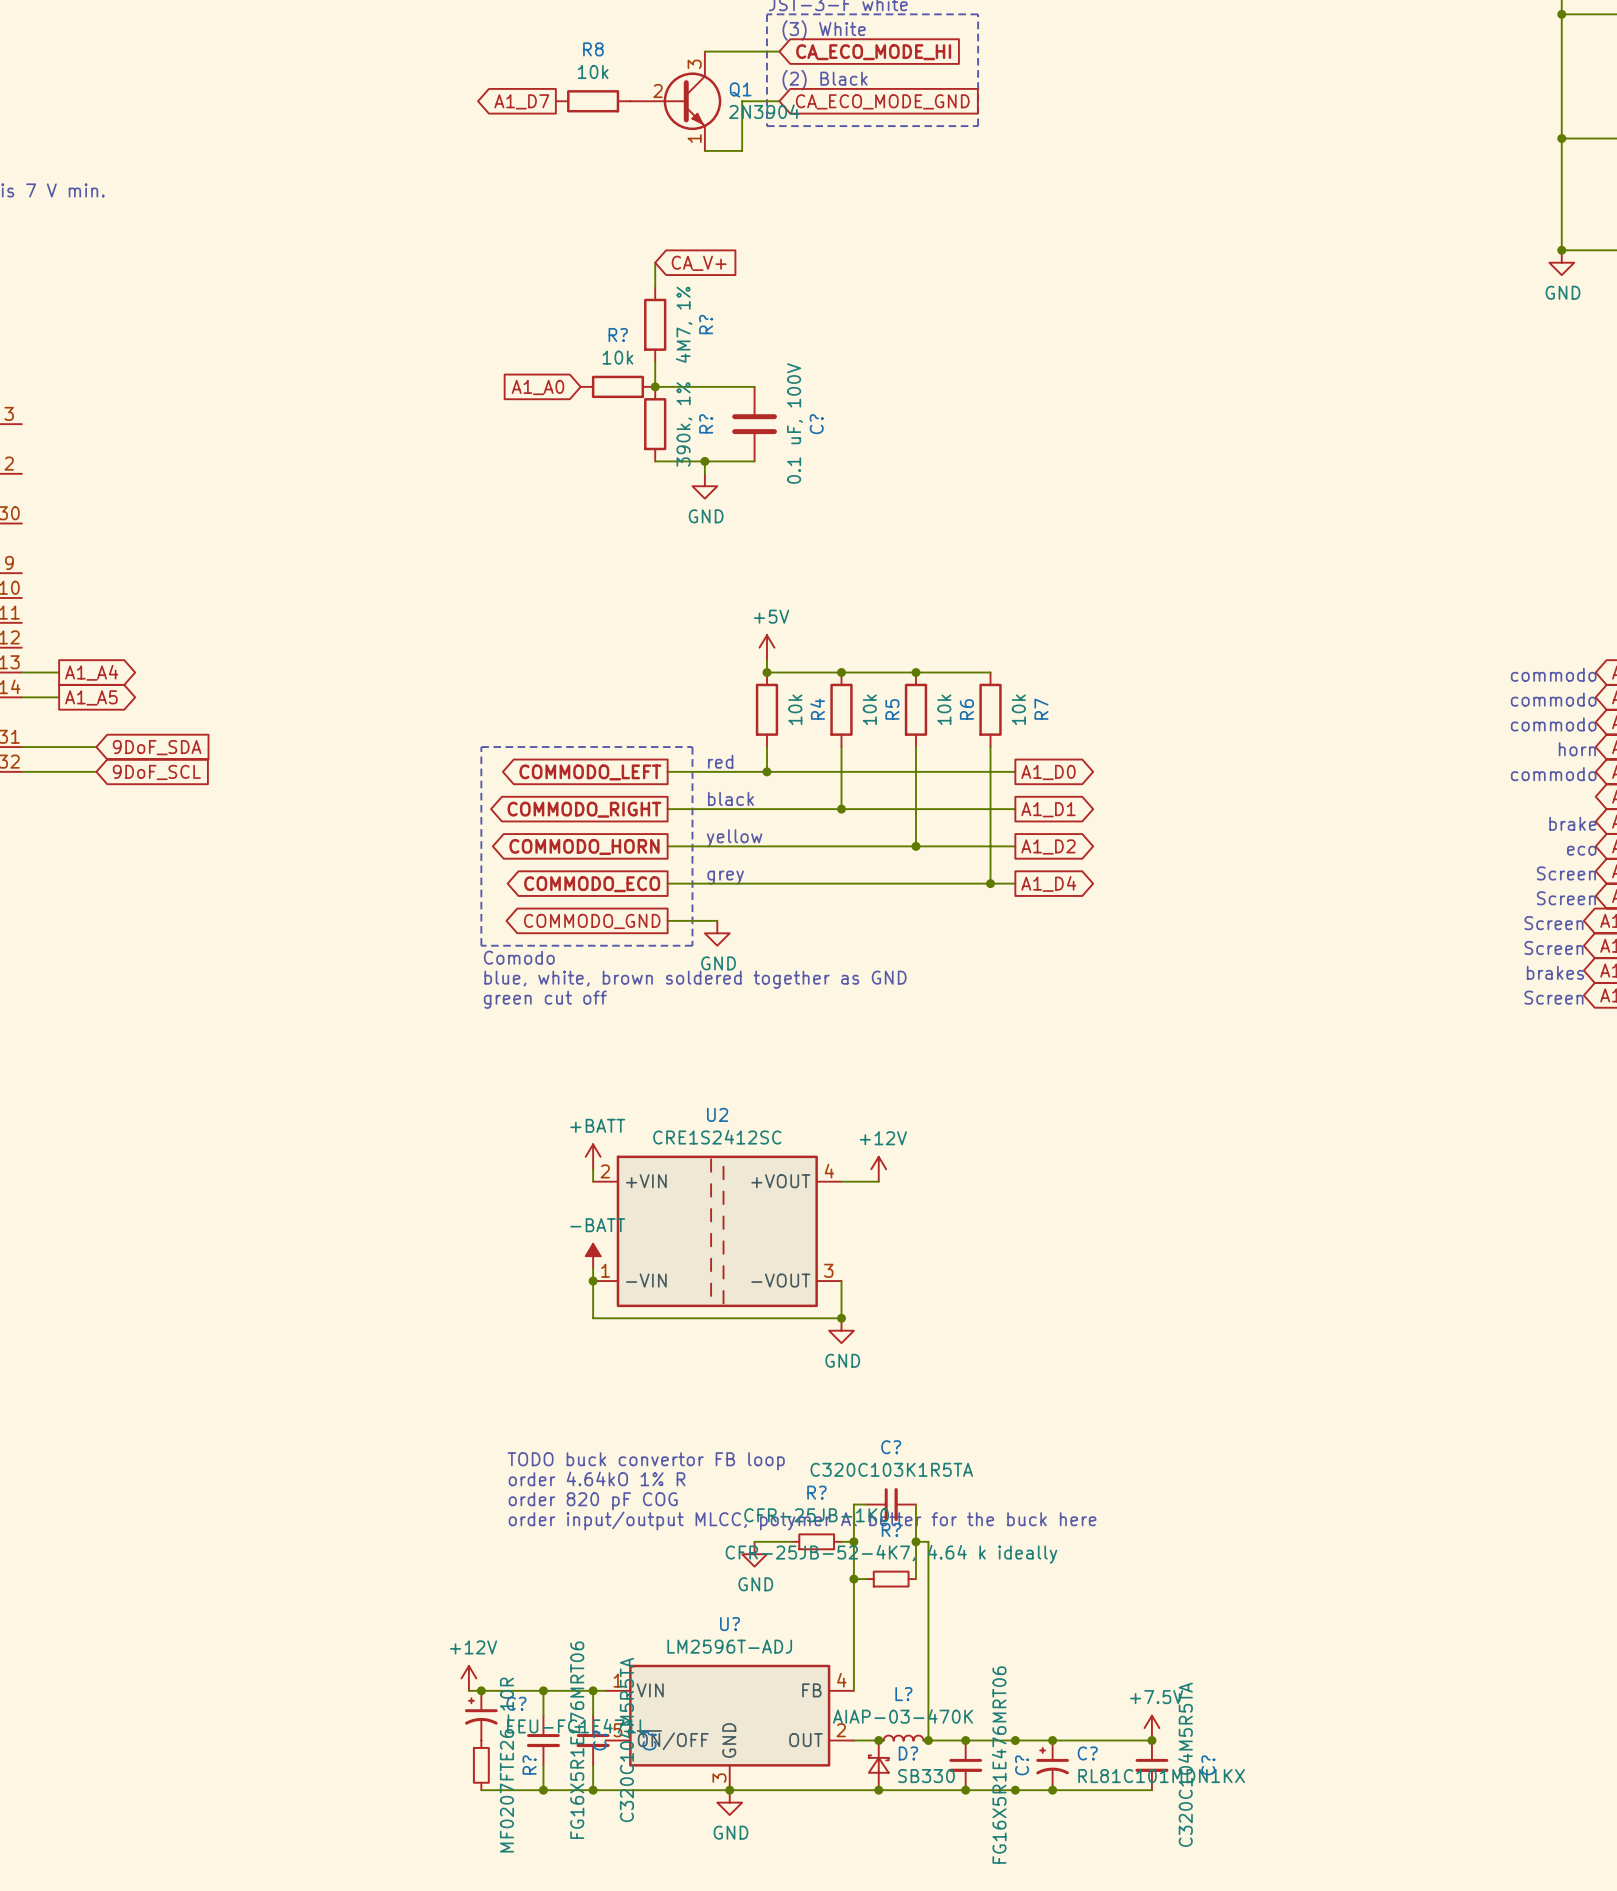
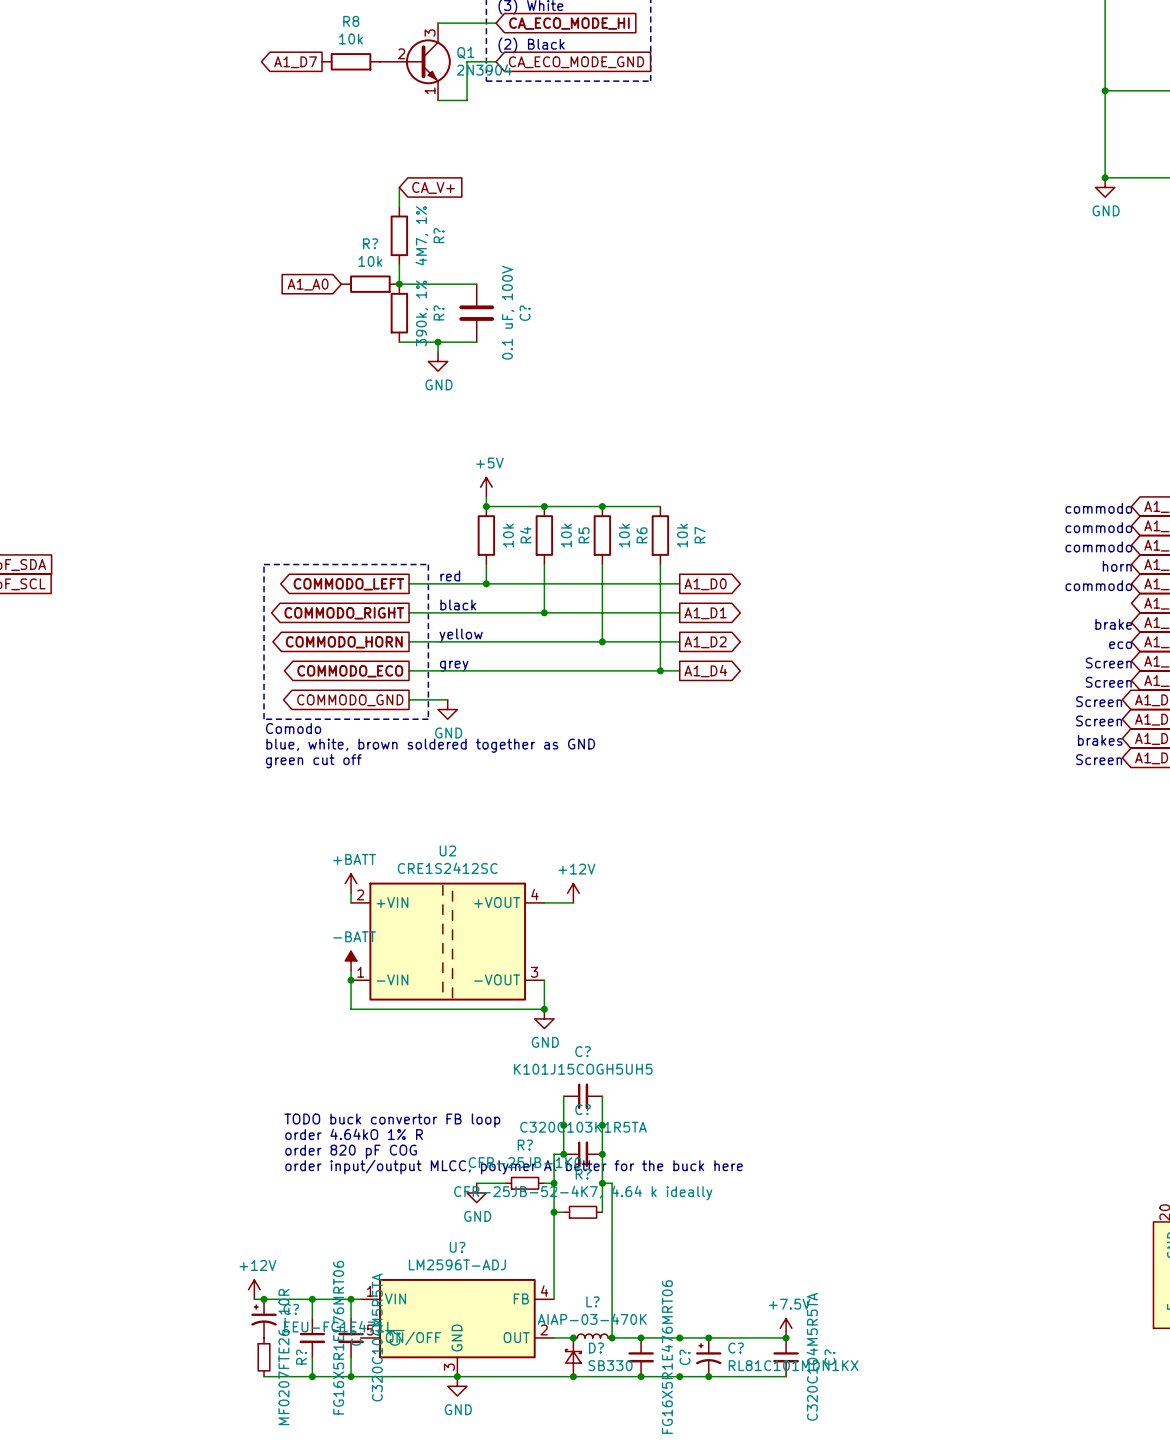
wire: none -> (563, 1096) (563, 1154)
C?: none -> K101J15COGH5UH5 (583, 1096)
wire: none -> (602, 1096) (602, 1154)
junction: none -> (563, 1125)
junction: none -> (602, 1125)
junction: none -> (563, 1154)
junction: none -> (602, 1154)

